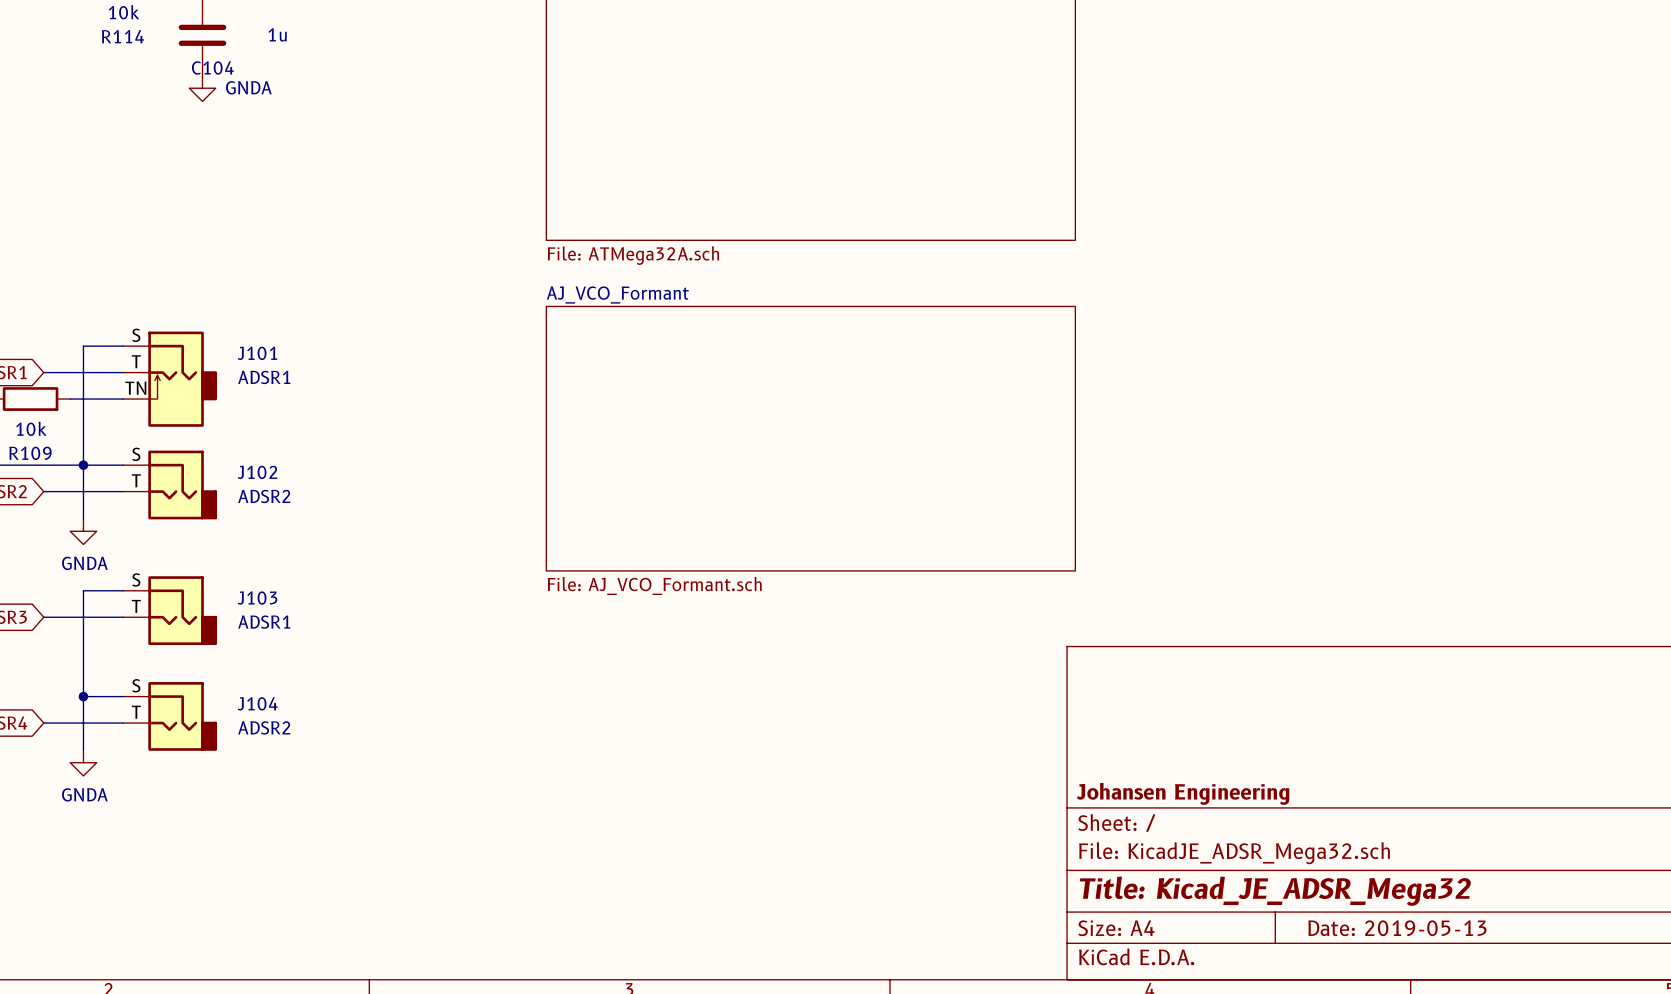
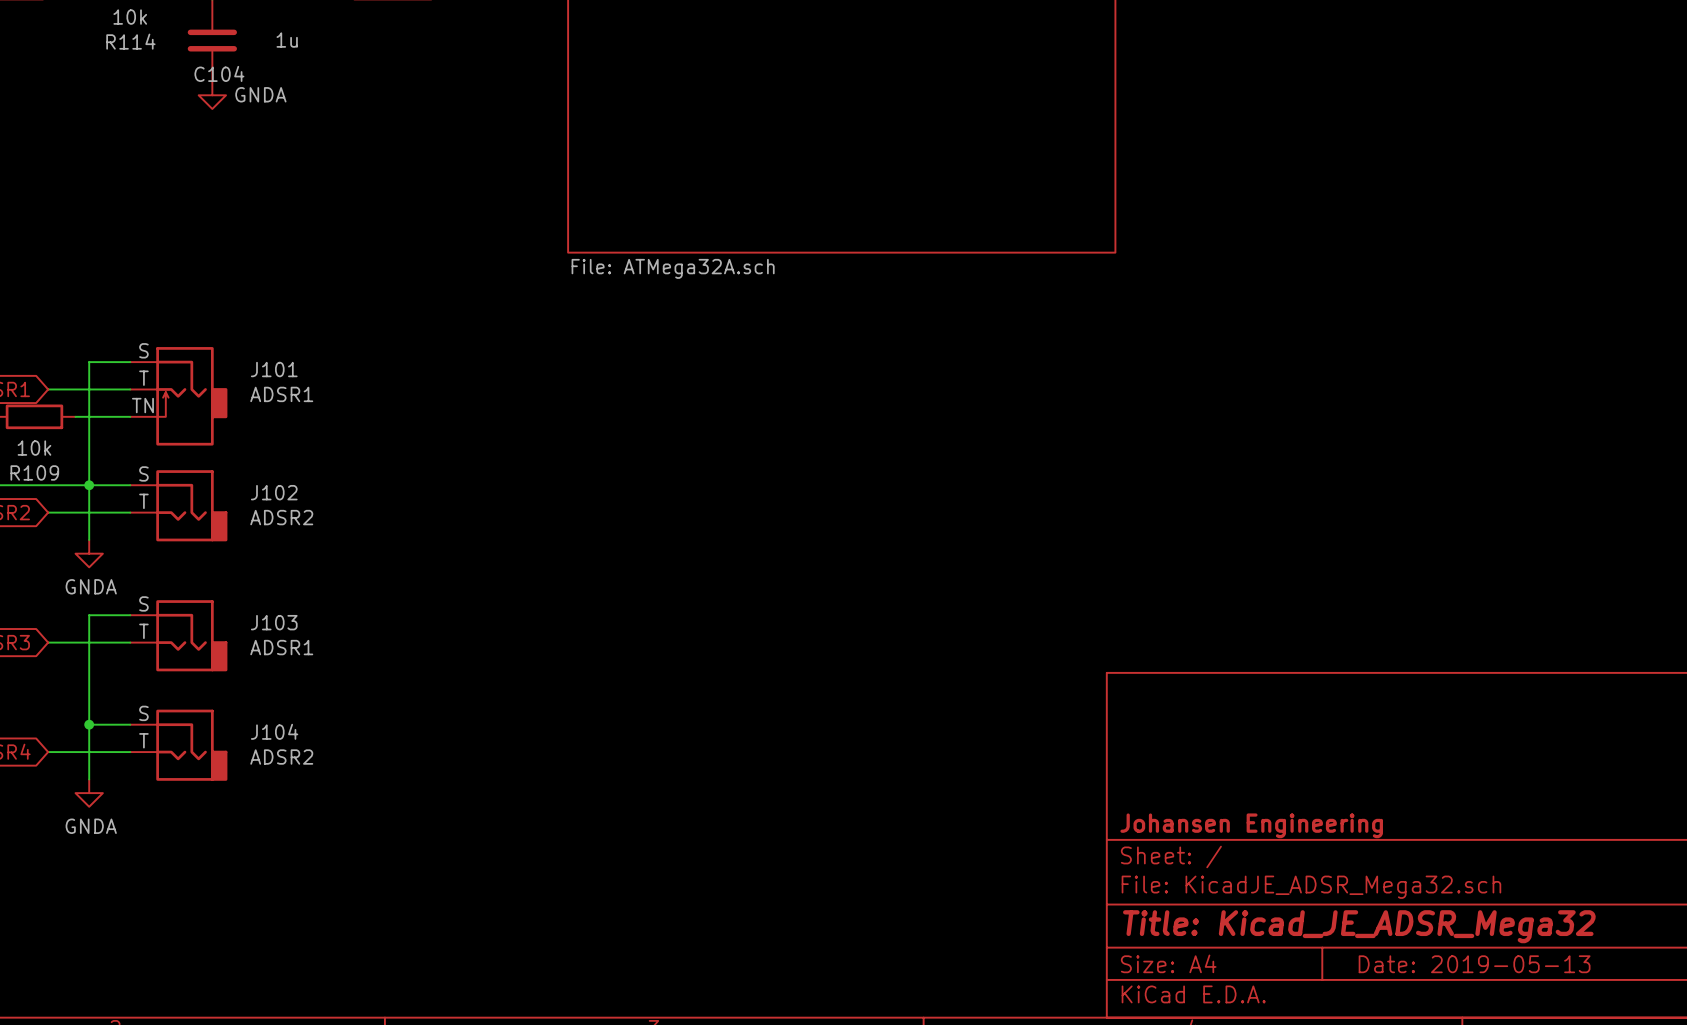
sheet AJ_VCO_Formant: File: AJ_VCO_Formant.sch (810, 438) -> none

